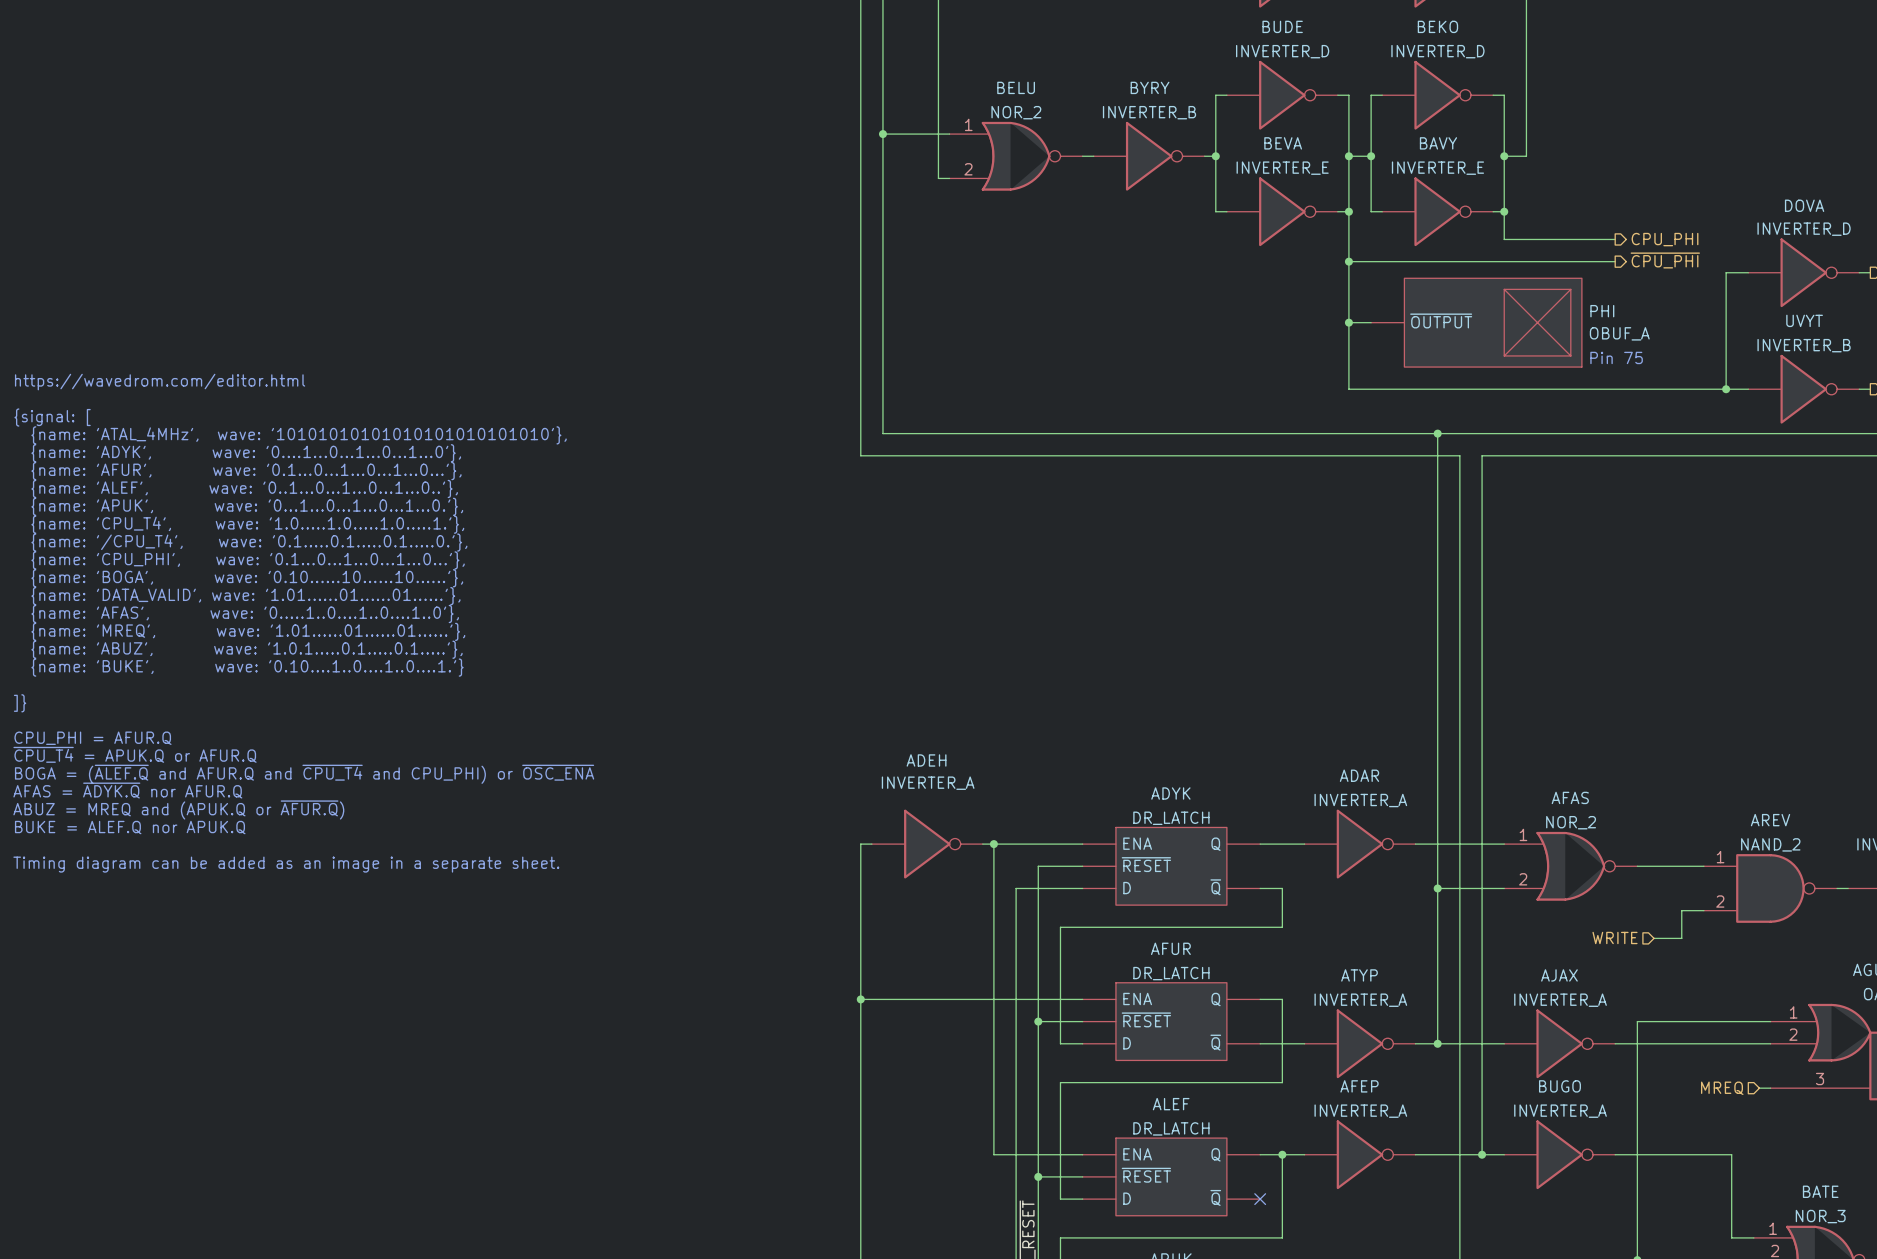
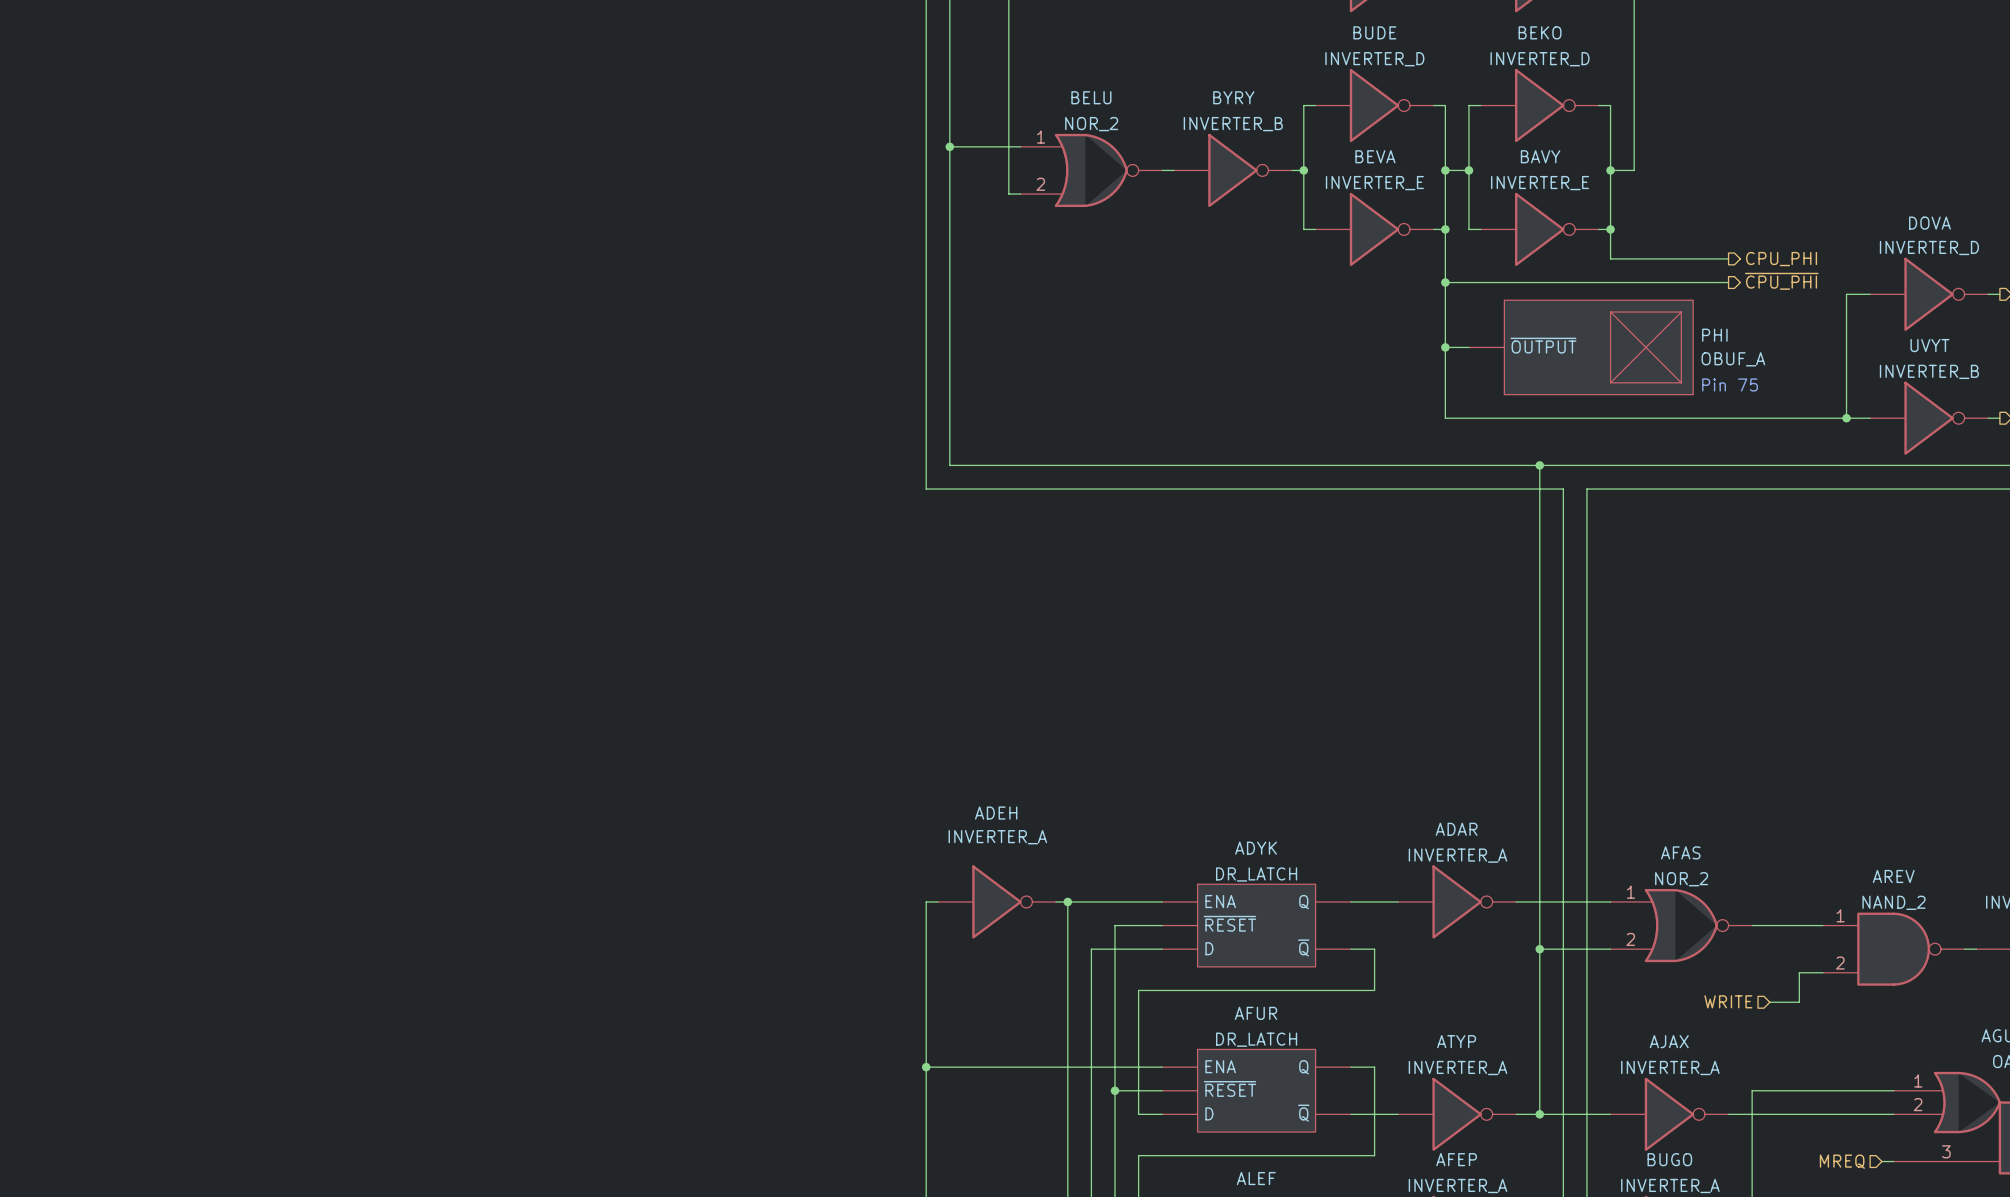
text: https://wavedrom.com/editor.html (160, 382) -> none
text: {signal: [ (52, 417) -> none
text: {name: 'ATAL_4MHz', wave: '10101010101010101010101010'}, (299, 435) -> none
text: {name: 'ADYK', wave: '0....1...0...1...0...1...0'}, (246, 453) -> none
text: {name: 'AFUR', wave: '0.1...0...1...0...1...0...'}, (246, 471) -> none
text: {name: 'ALEF', wave: '0..1...0...1...0...1...0..'}, (244, 488) -> none
text: {name: 'APUK', wave: '0...1...0...1...0...1...0.'}, (247, 506) -> none
text: {name: 'CPU_T4', wave: '1.0.....1.0.....1.0.....1.'}, (247, 524) -> none
text: {name: '/CPU_T4', wave: '0.1.....0.1.....0.1.....0.'}, (249, 542) -> none
text: {name: 'CPU_PHI', wave: '0.1...0...1...0...1...0...'}, (248, 560) -> none
text: {name: 'BOGA', wave: '0.10......10......10......'}, (247, 578) -> none
text: {name: 'DATA_VALID', wave: '1.01......01......01......'}, (245, 596) -> none
text: {name: 'AFAS', wave: '0.....1..0....1..0....1..0'}, (245, 614) -> none
text: {name: 'MREQ', wave: '1.01......01......01......'}, (248, 631) -> none
text: {name: 'ABUZ', wave: '1.0.1.....0.1.....0.1.....'}, (246, 649) -> none
text: {name: 'BUKE', wave: '0.10....1..0....1..0....1.'} (247, 667) -> none
text: ]} (20, 703) -> none
text: CPU_PHI = AFUR.Q (92, 738) -> none
text: ~{CPU_T4} = APUK.Q or AFUR.Q (135, 754) -> none
text: BOGA = (~{ALEF.Q} and AFUR.Q and ~{CPU_T4} and CPU_PHI) or ~{OSC_ENA} (304, 774) -> none
text: AFAS = ~{ADYK.Q} nor AFUR.Q (127, 790) -> none
text: ABUZ = MREQ and (APUK.Q or ~{AFUR.Q}) (178, 809) -> none
text: BUKE = ALEF.Q nor APUK.Q (130, 827) -> none
text: Timing diagram can be added as an image in a separate sheet. (286, 864) -> none

